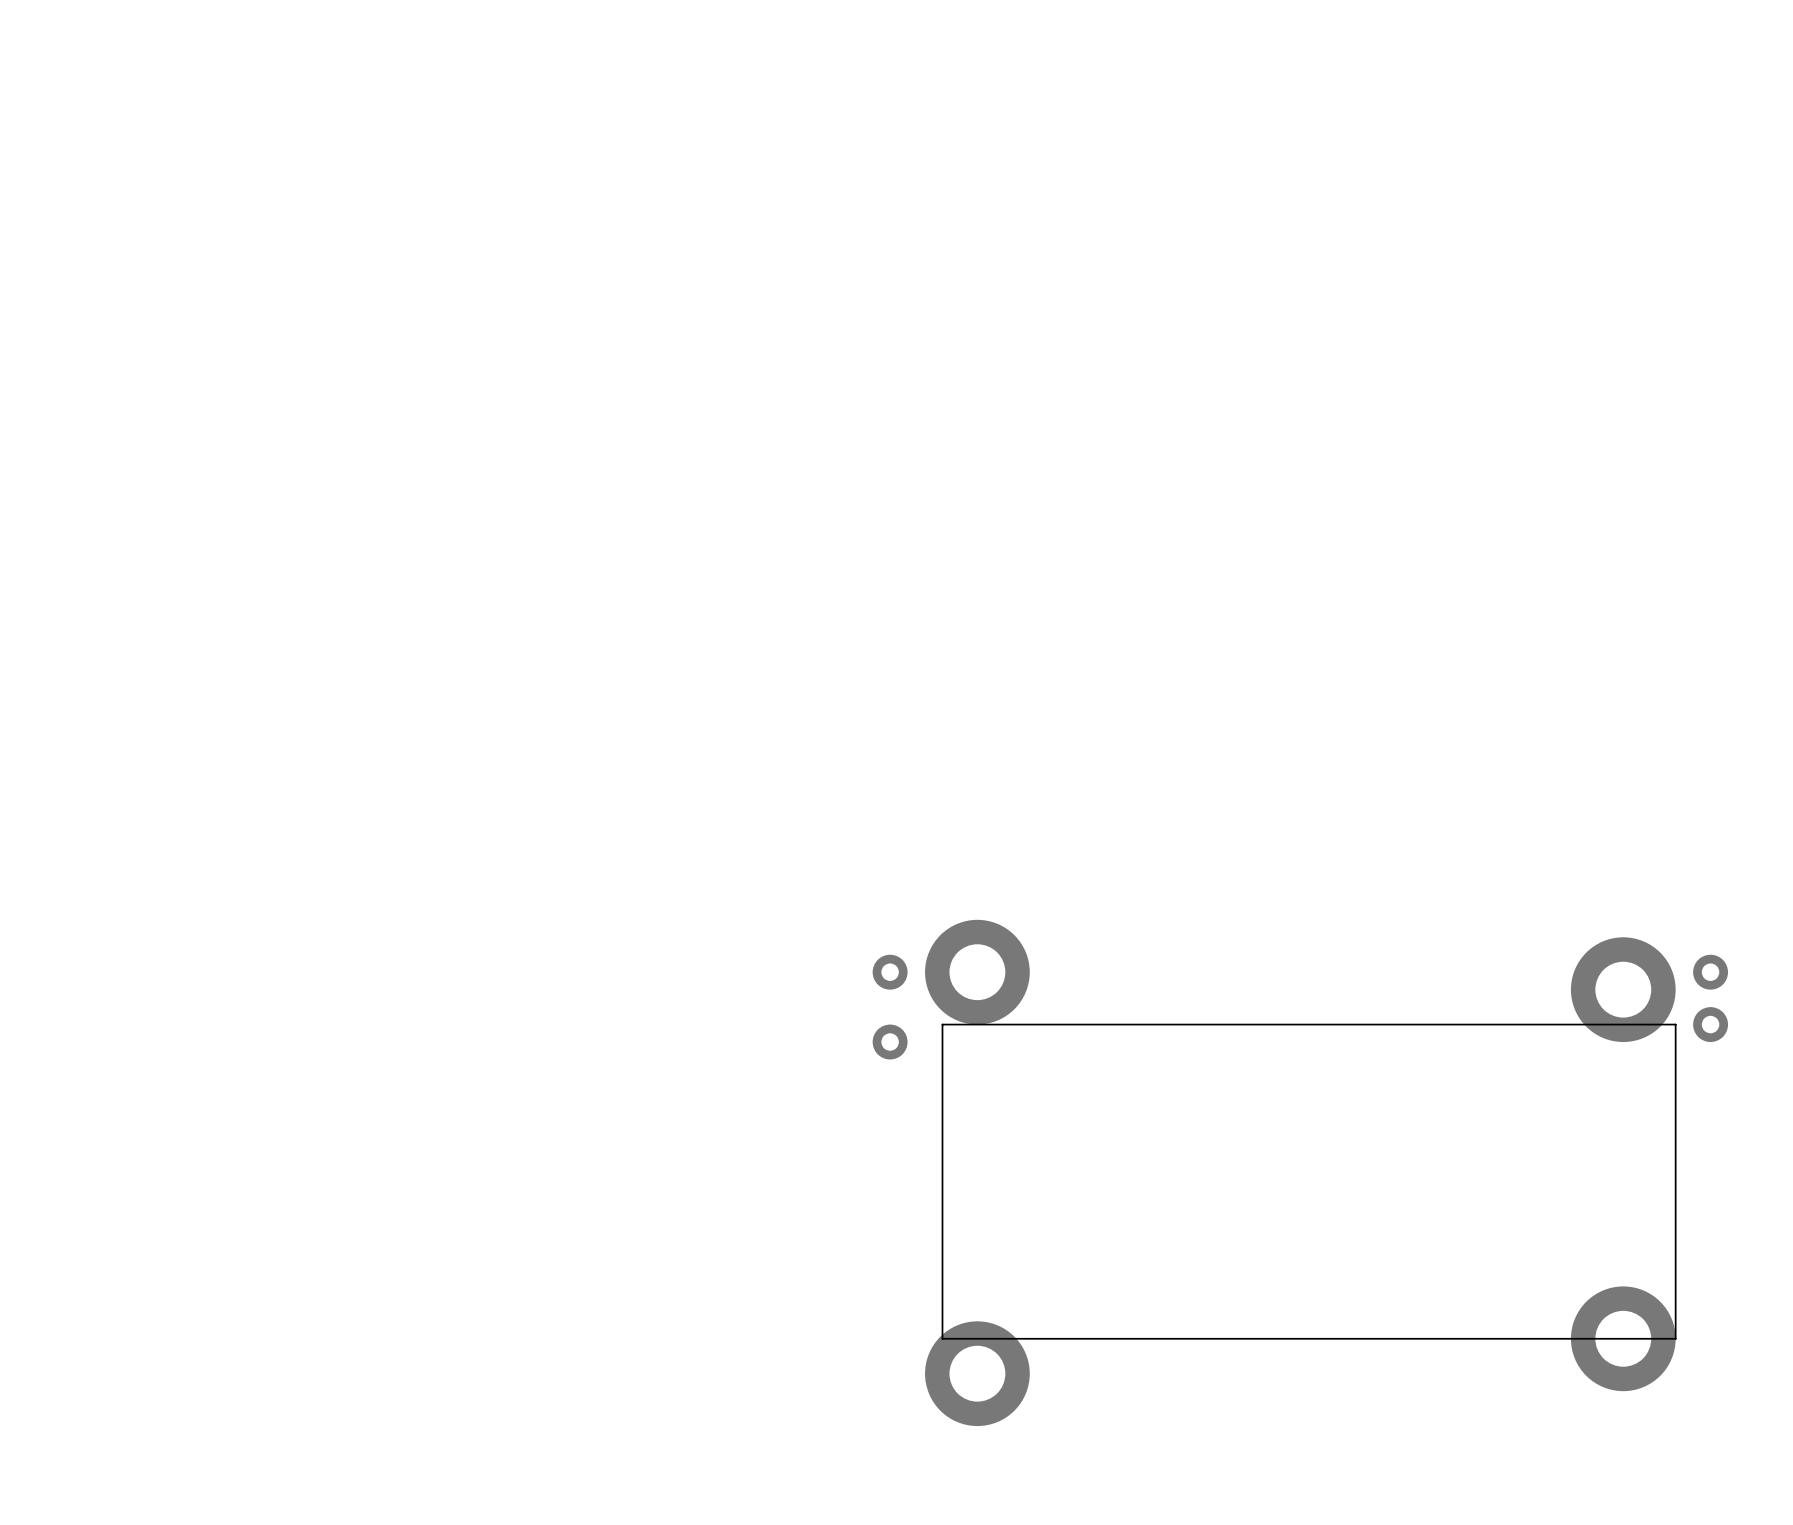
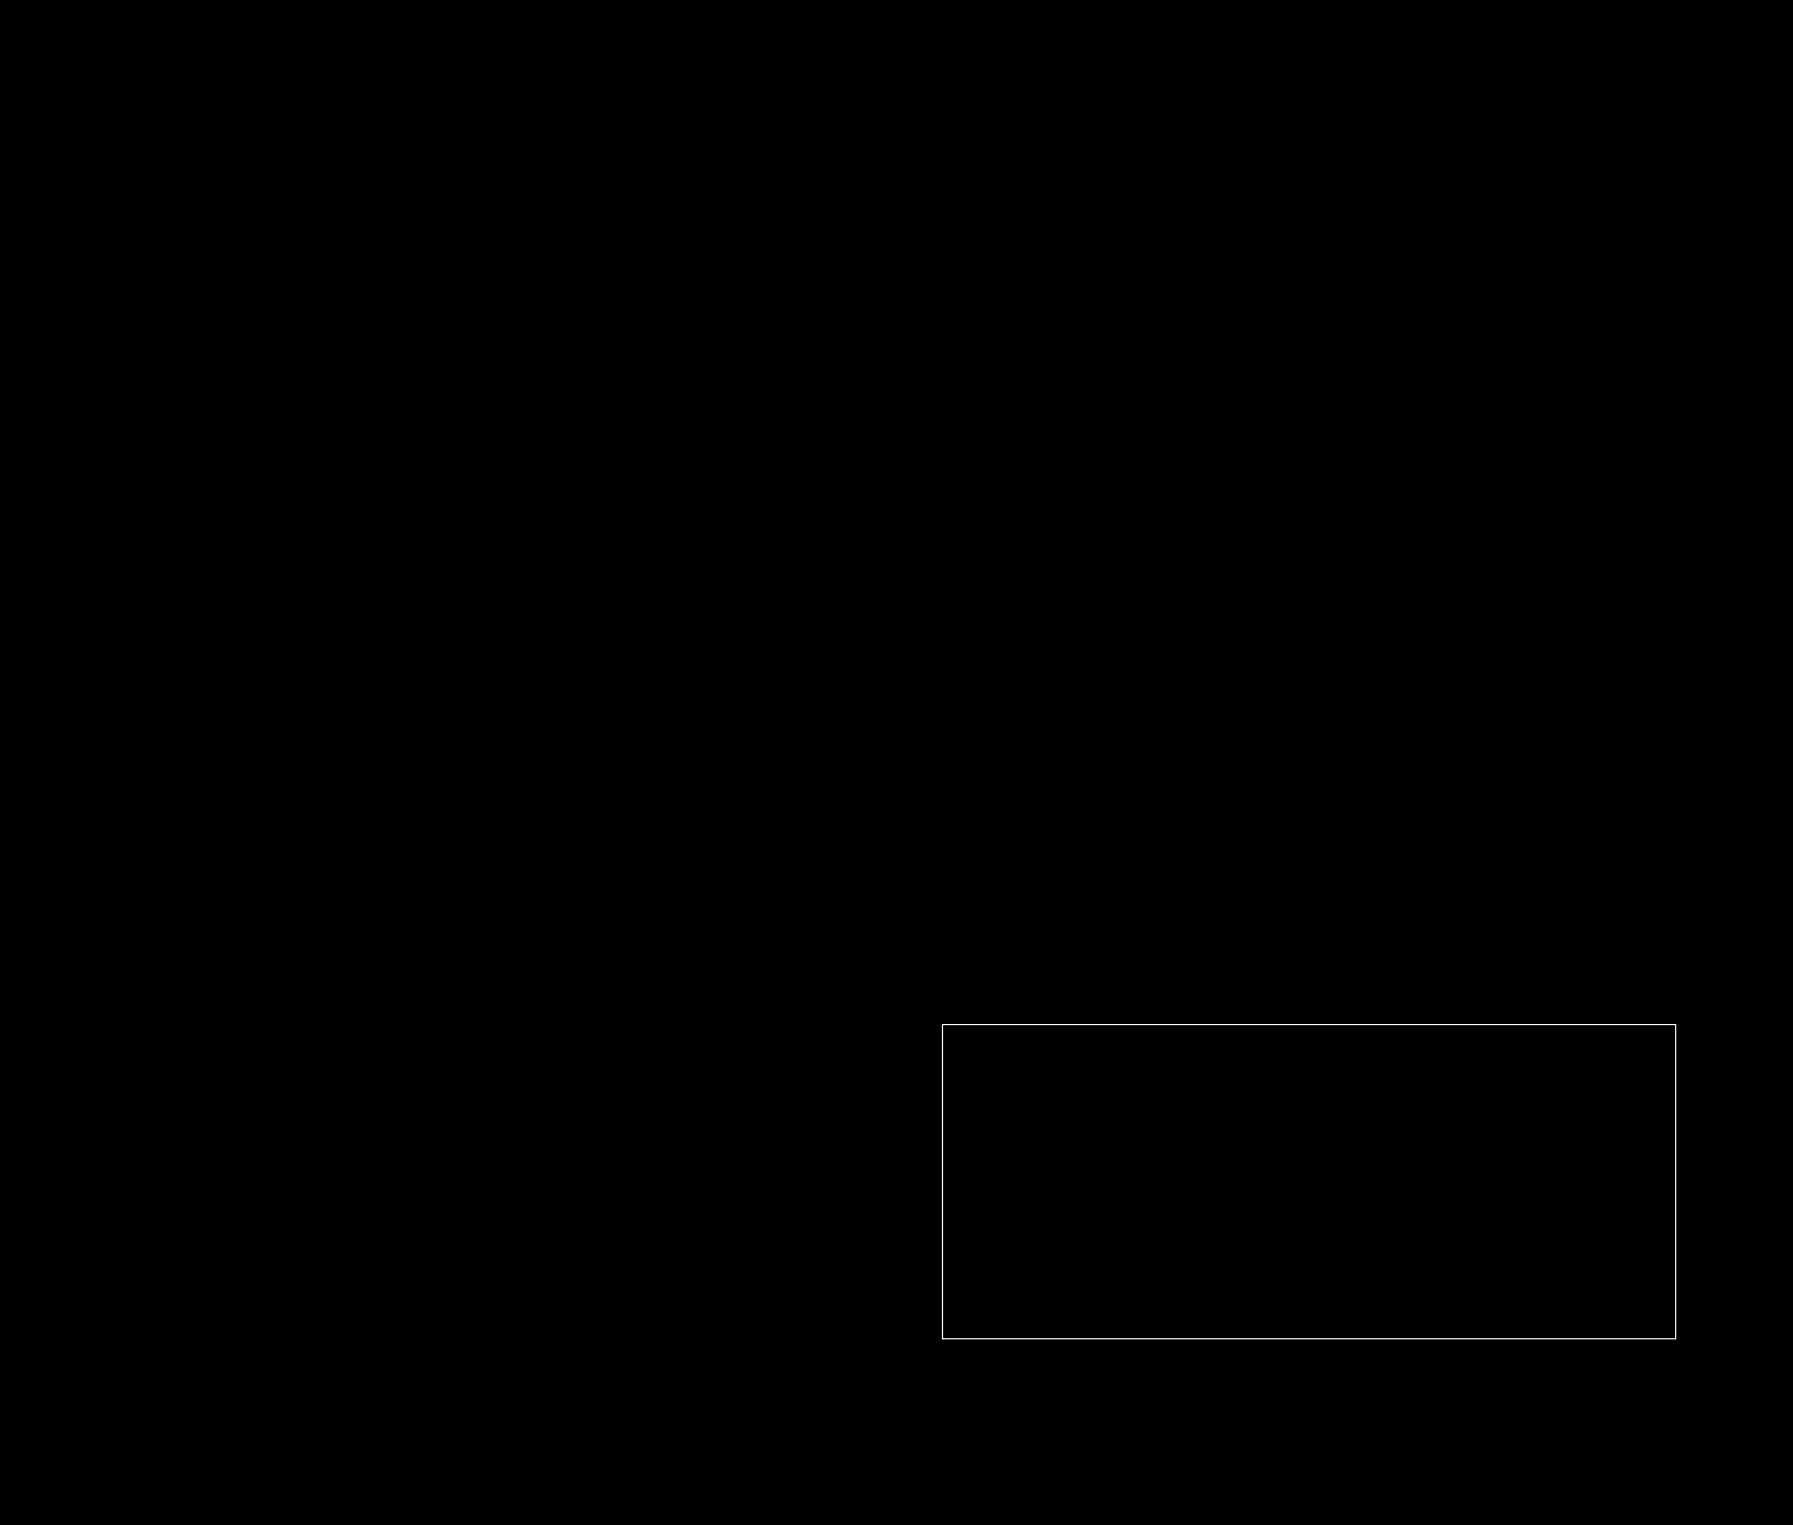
via: (890, 972) -> none
via: (977, 972) -> none
via: (1710, 972) -> none
via: (1623, 989) -> none
via: (1710, 1024) -> none
via: (890, 1042) -> none
via: (1623, 1338) -> none
via: (977, 1373) -> none

